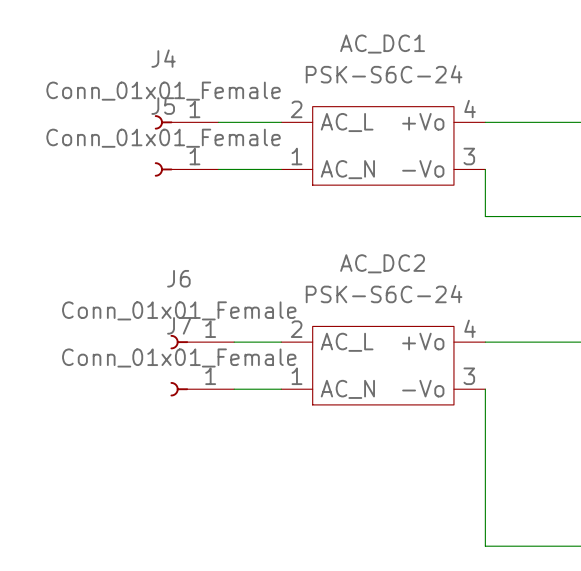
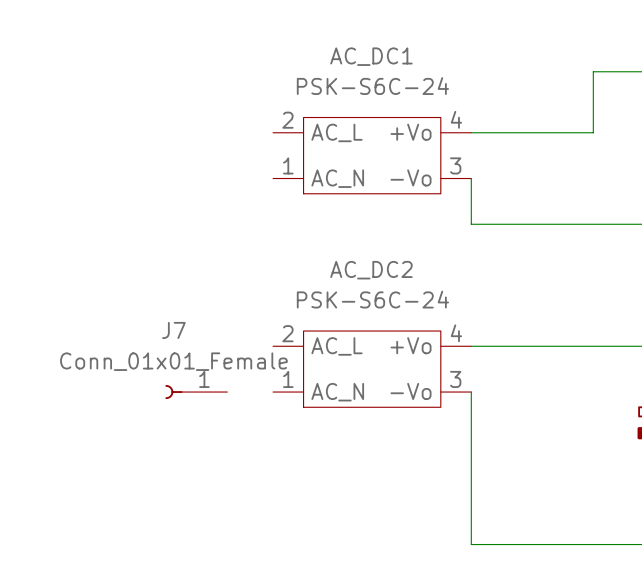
J4: Conn_01x01_Female (186, 122) -> none
wire: (218, 122) (281, 122) -> none
J5: Conn_01x01_Female (186, 169) -> none
wire: (218, 169) (281, 169) -> none
J6: Conn_01x01_Female (202, 342) -> none
wire: (234, 342) (281, 342) -> none
wire: (234, 389) (281, 389) -> none

